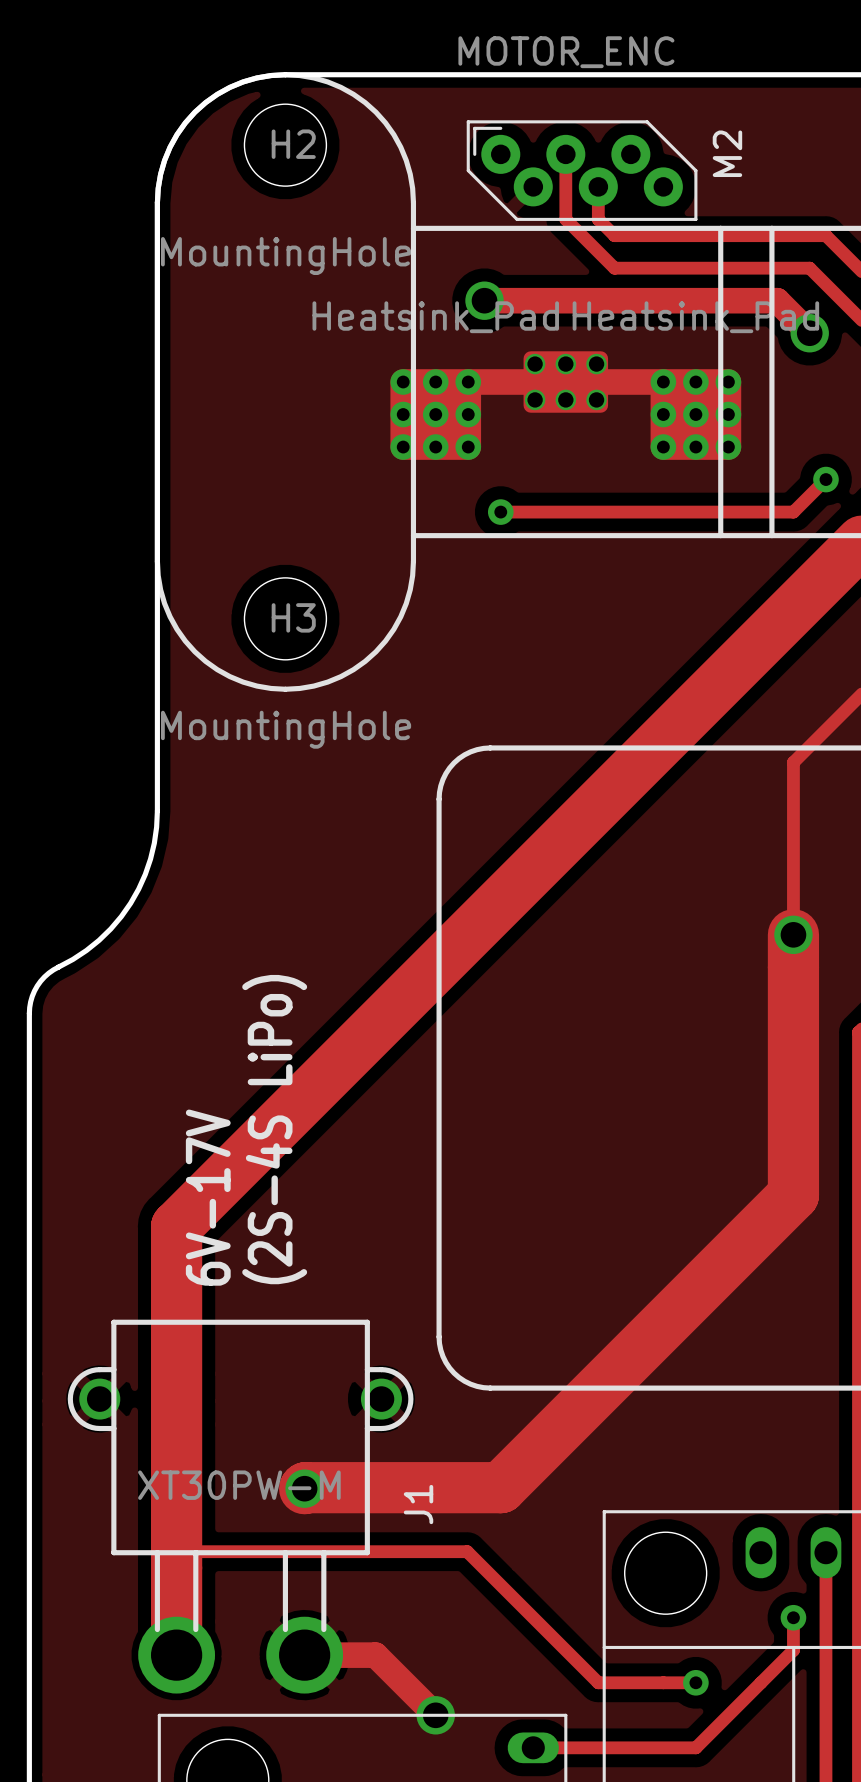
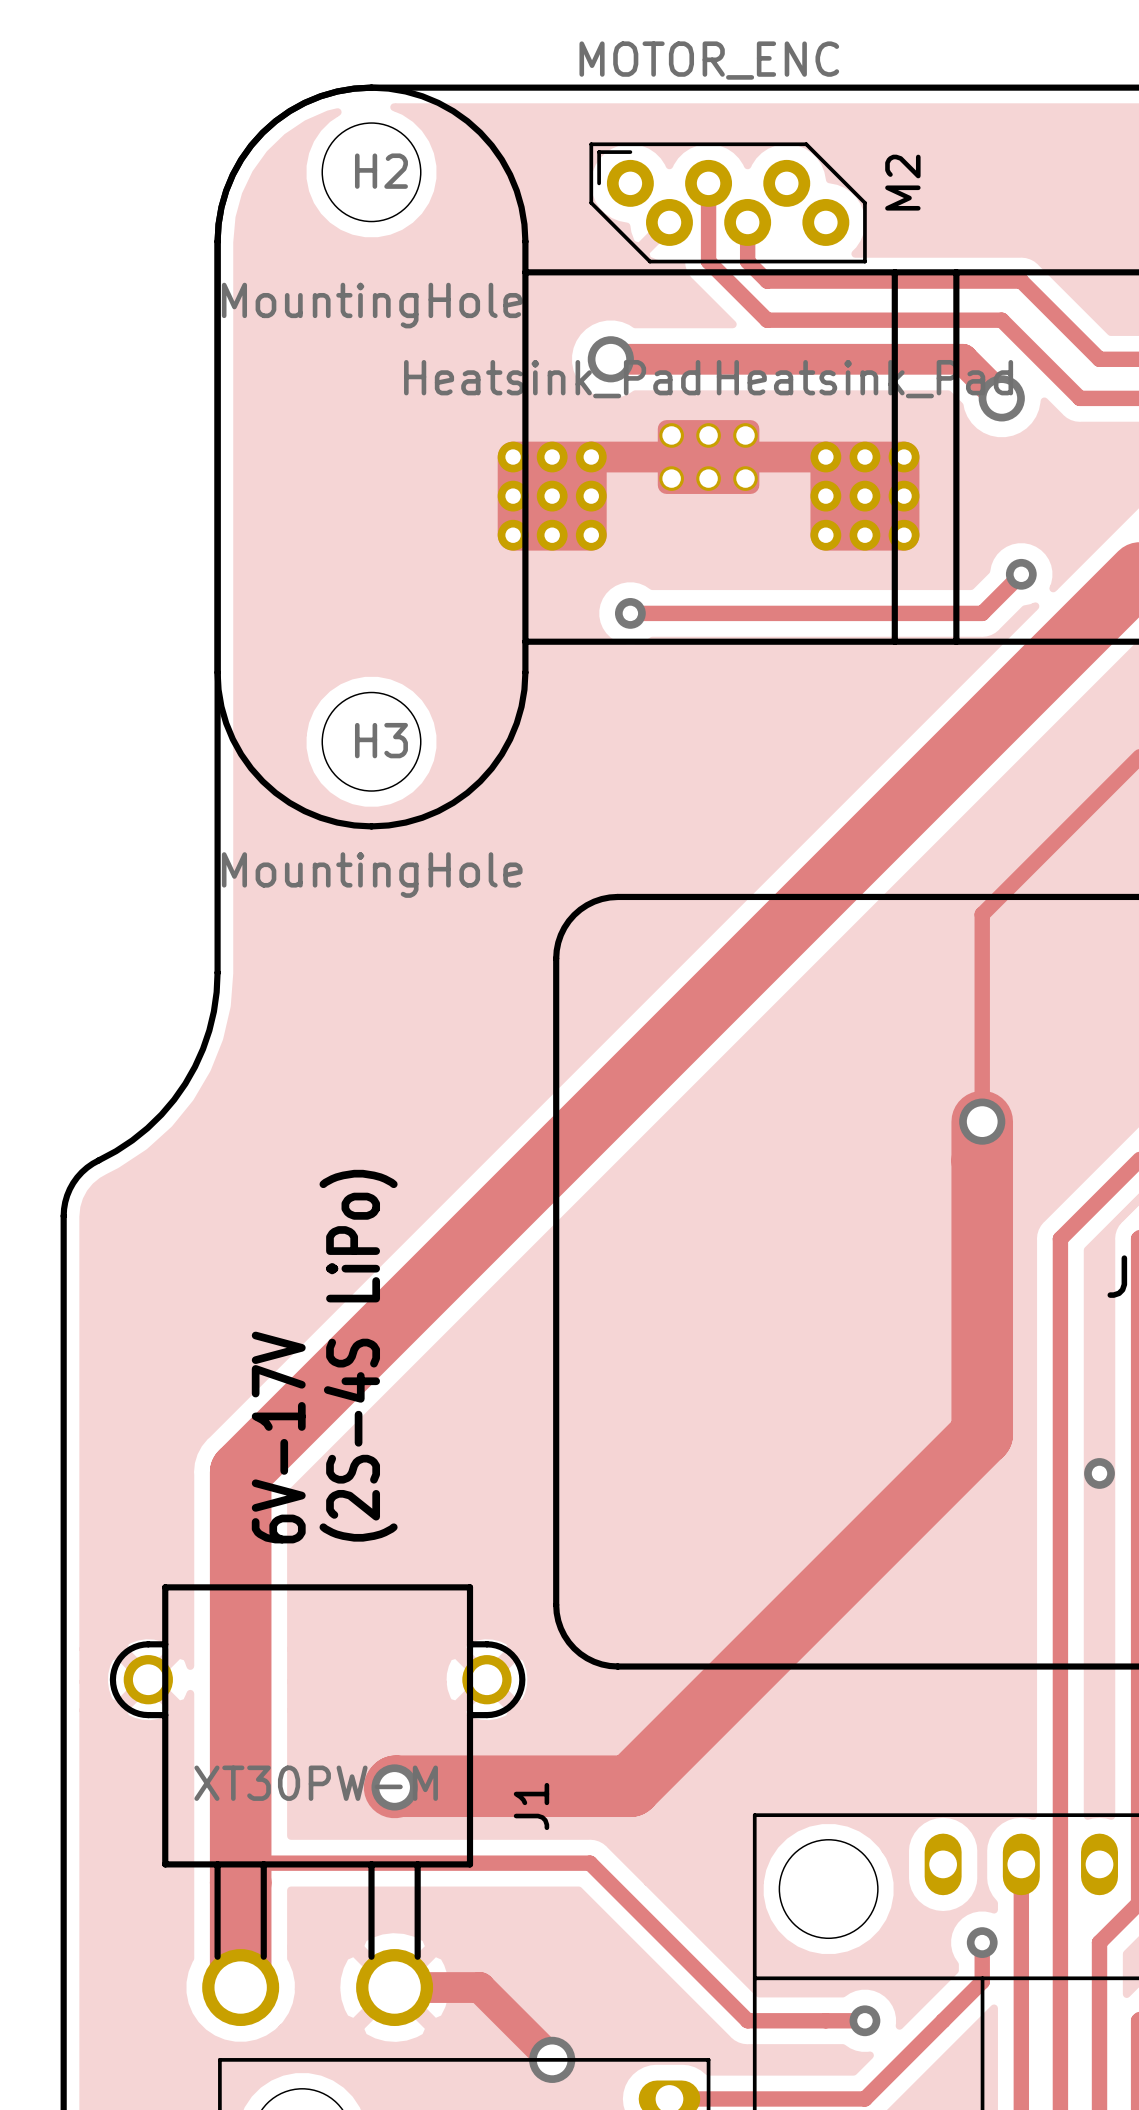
J1 footprint: [67, 1319, 414, 1694] -> [109, 1584, 526, 2027]

